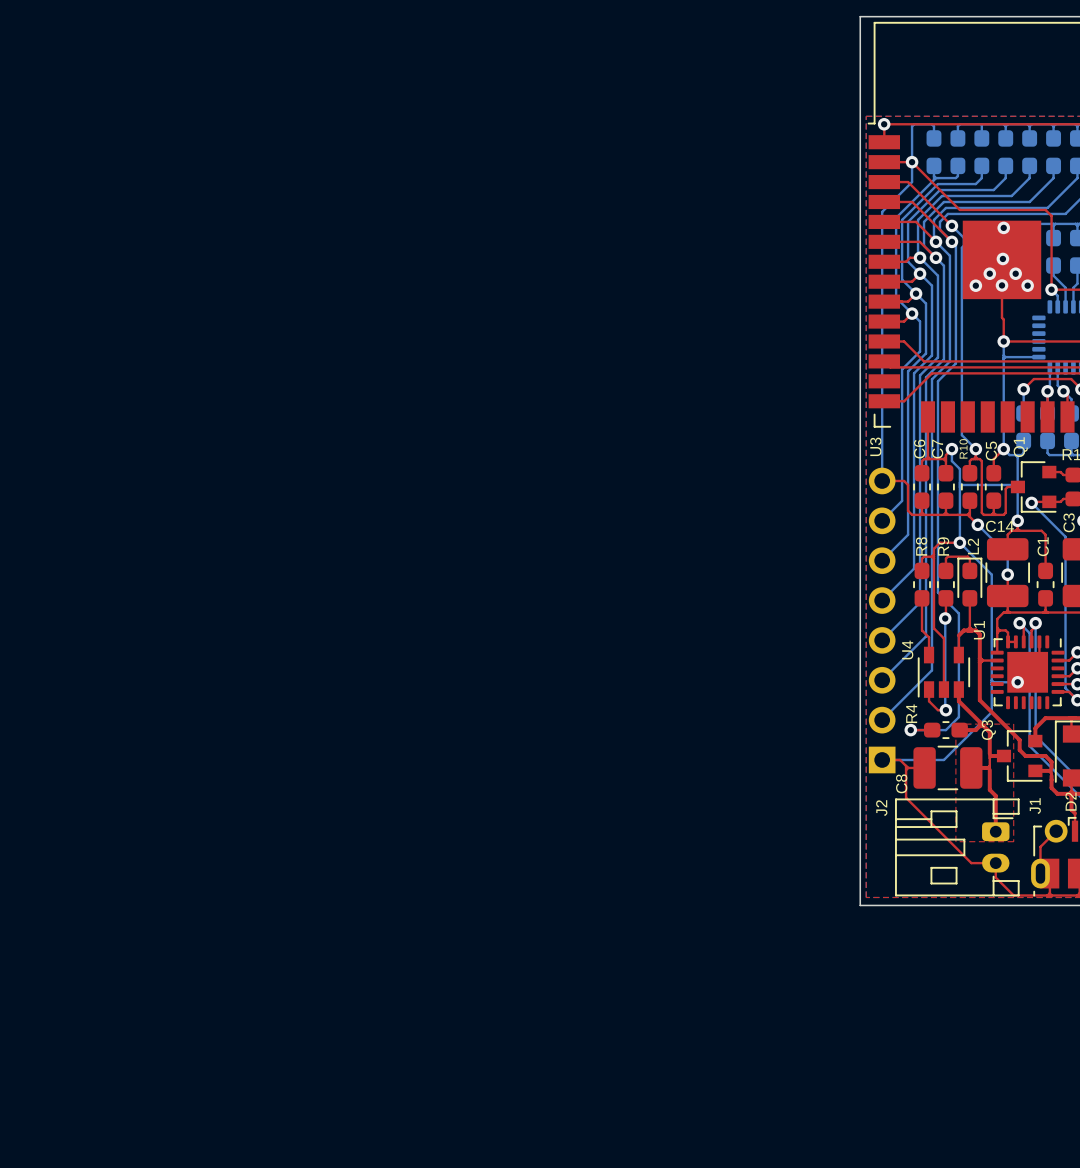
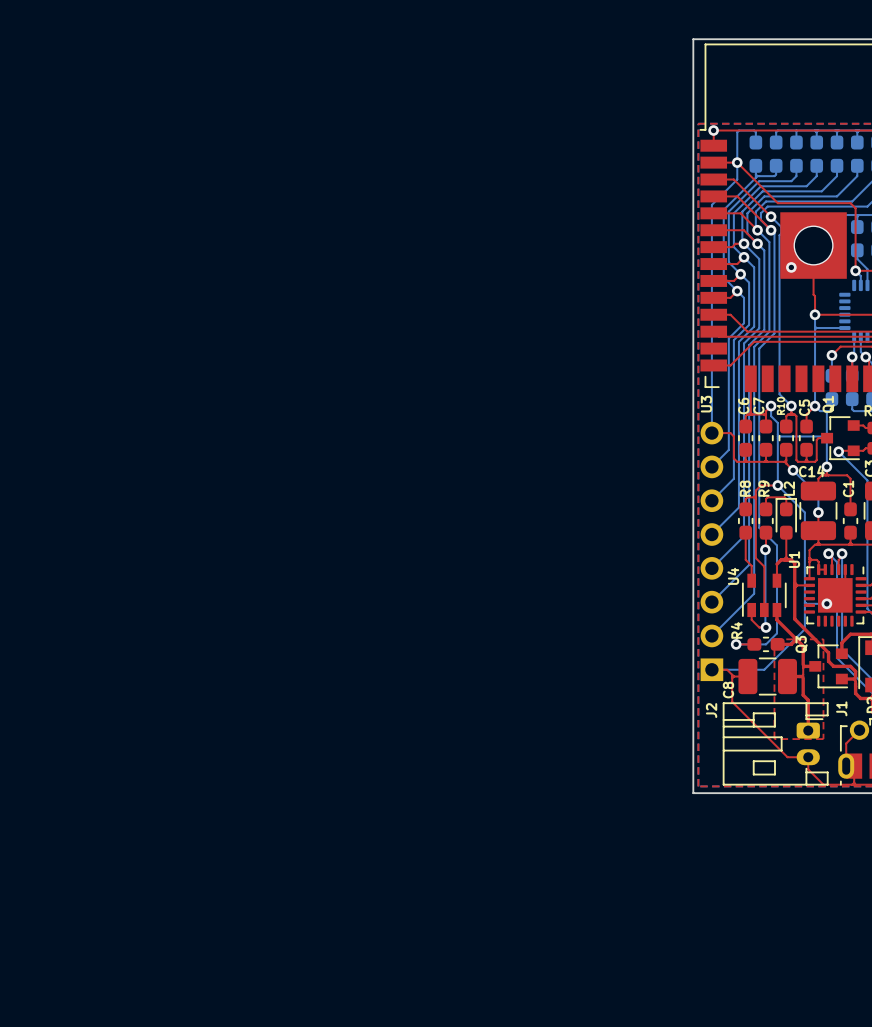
via: (1003, 227) -> none
via size: [996, 252, 1010, 266] -> [793, 225, 834, 266]
via: (989, 273) -> none
via: (1015, 273) -> none
via: (1001, 285) -> none
via: (1027, 285) -> none

